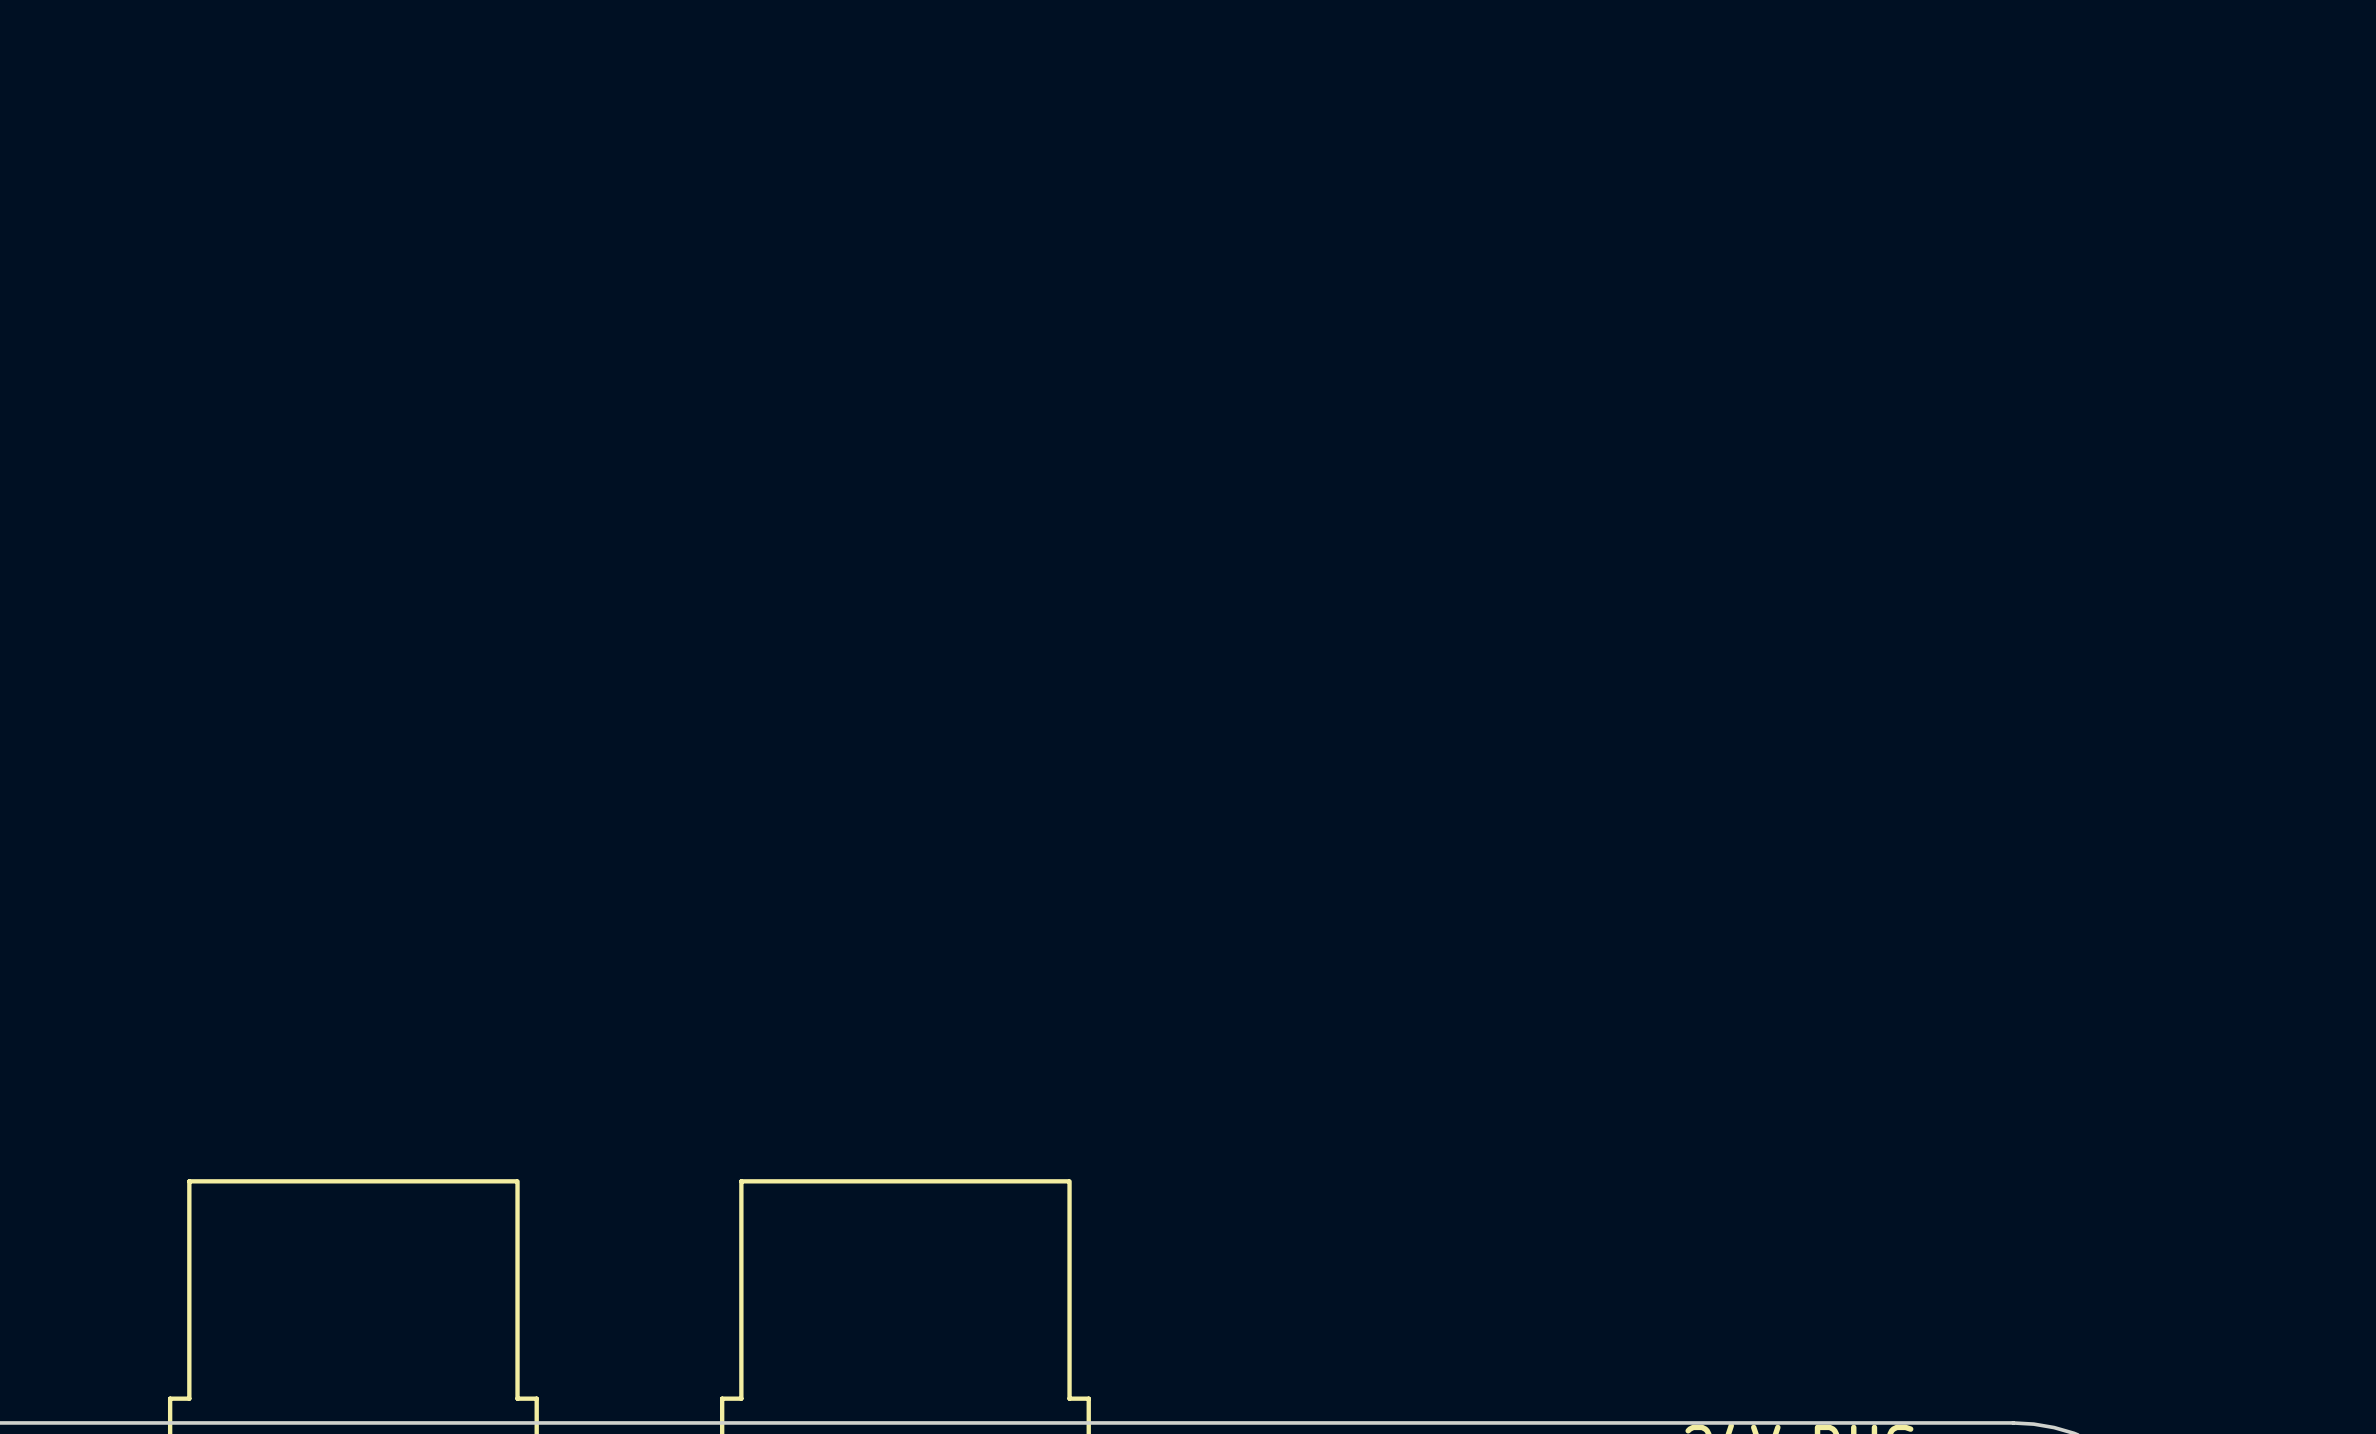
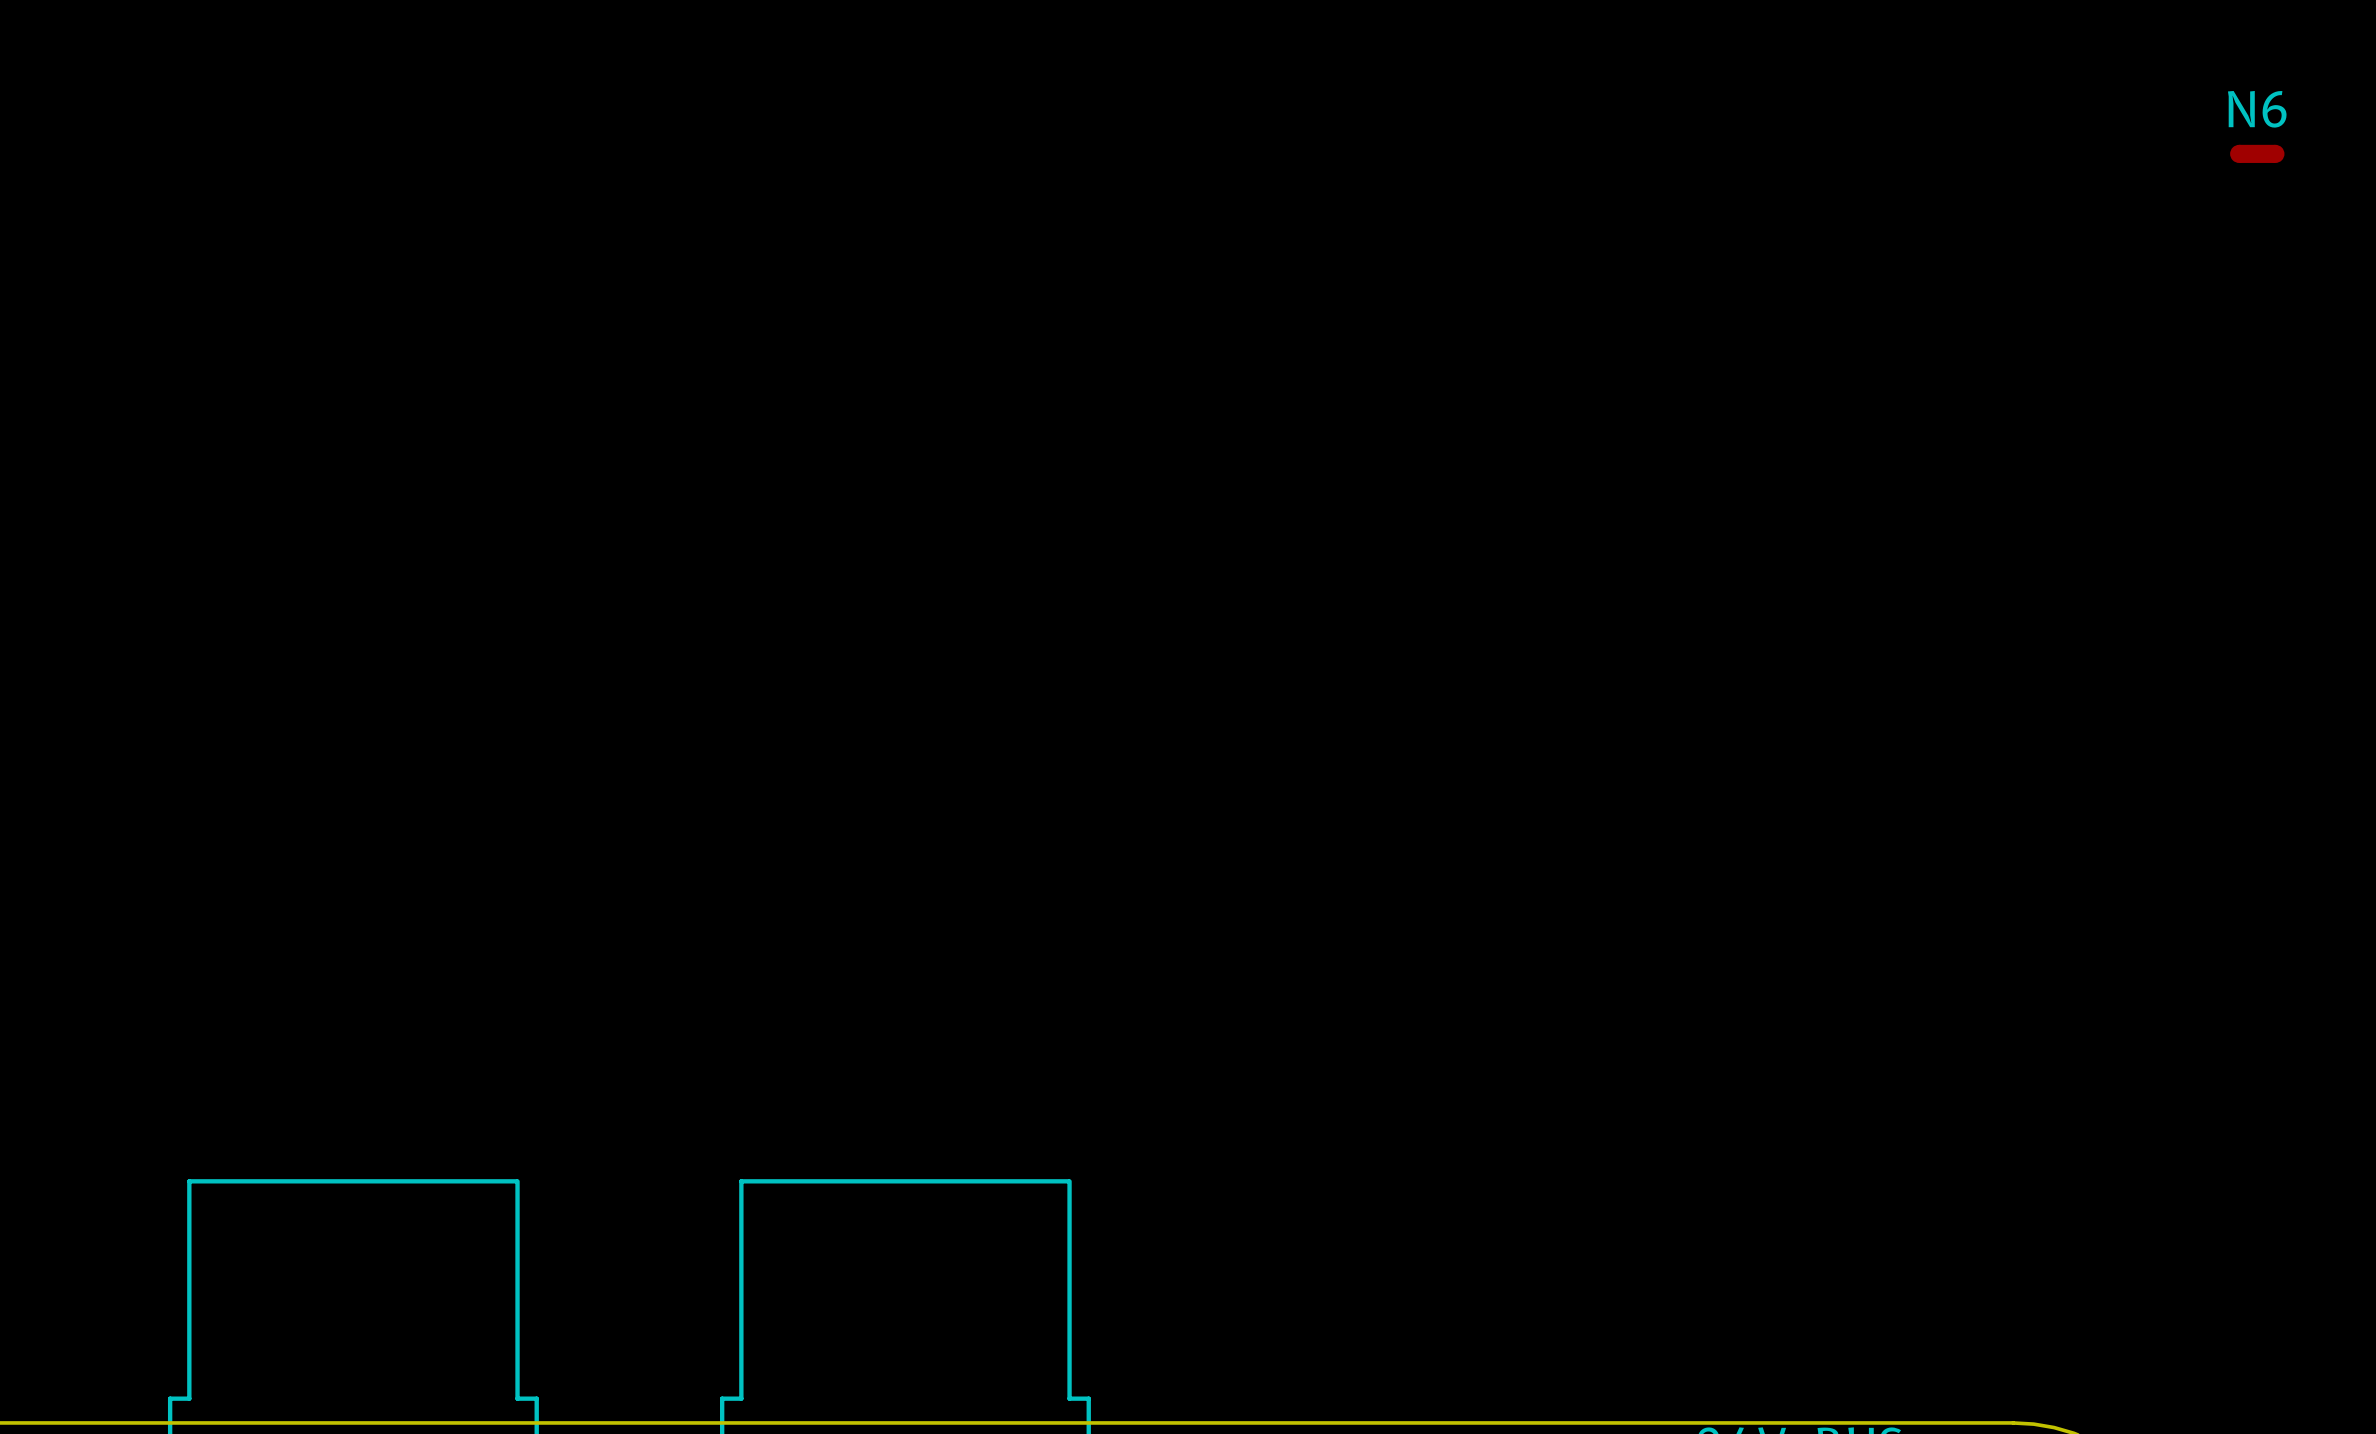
N6: none -> (2257, 153)

